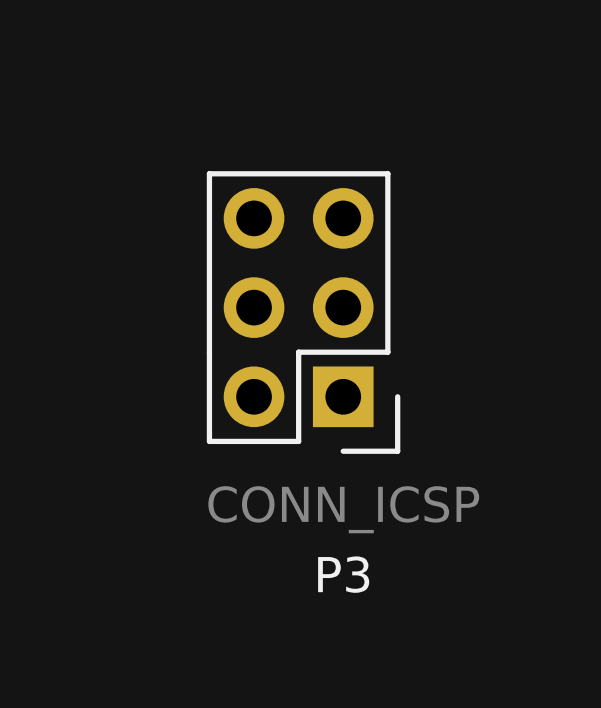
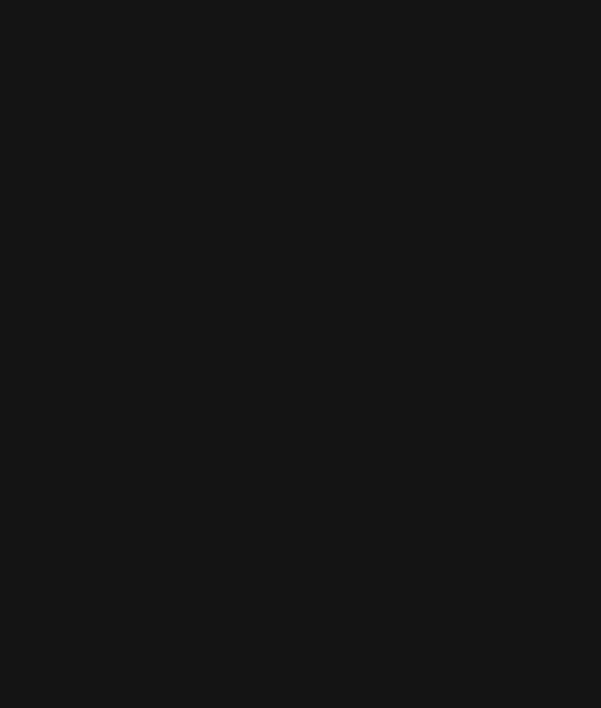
P3: CONN_ICSP (303, 312) -> none

